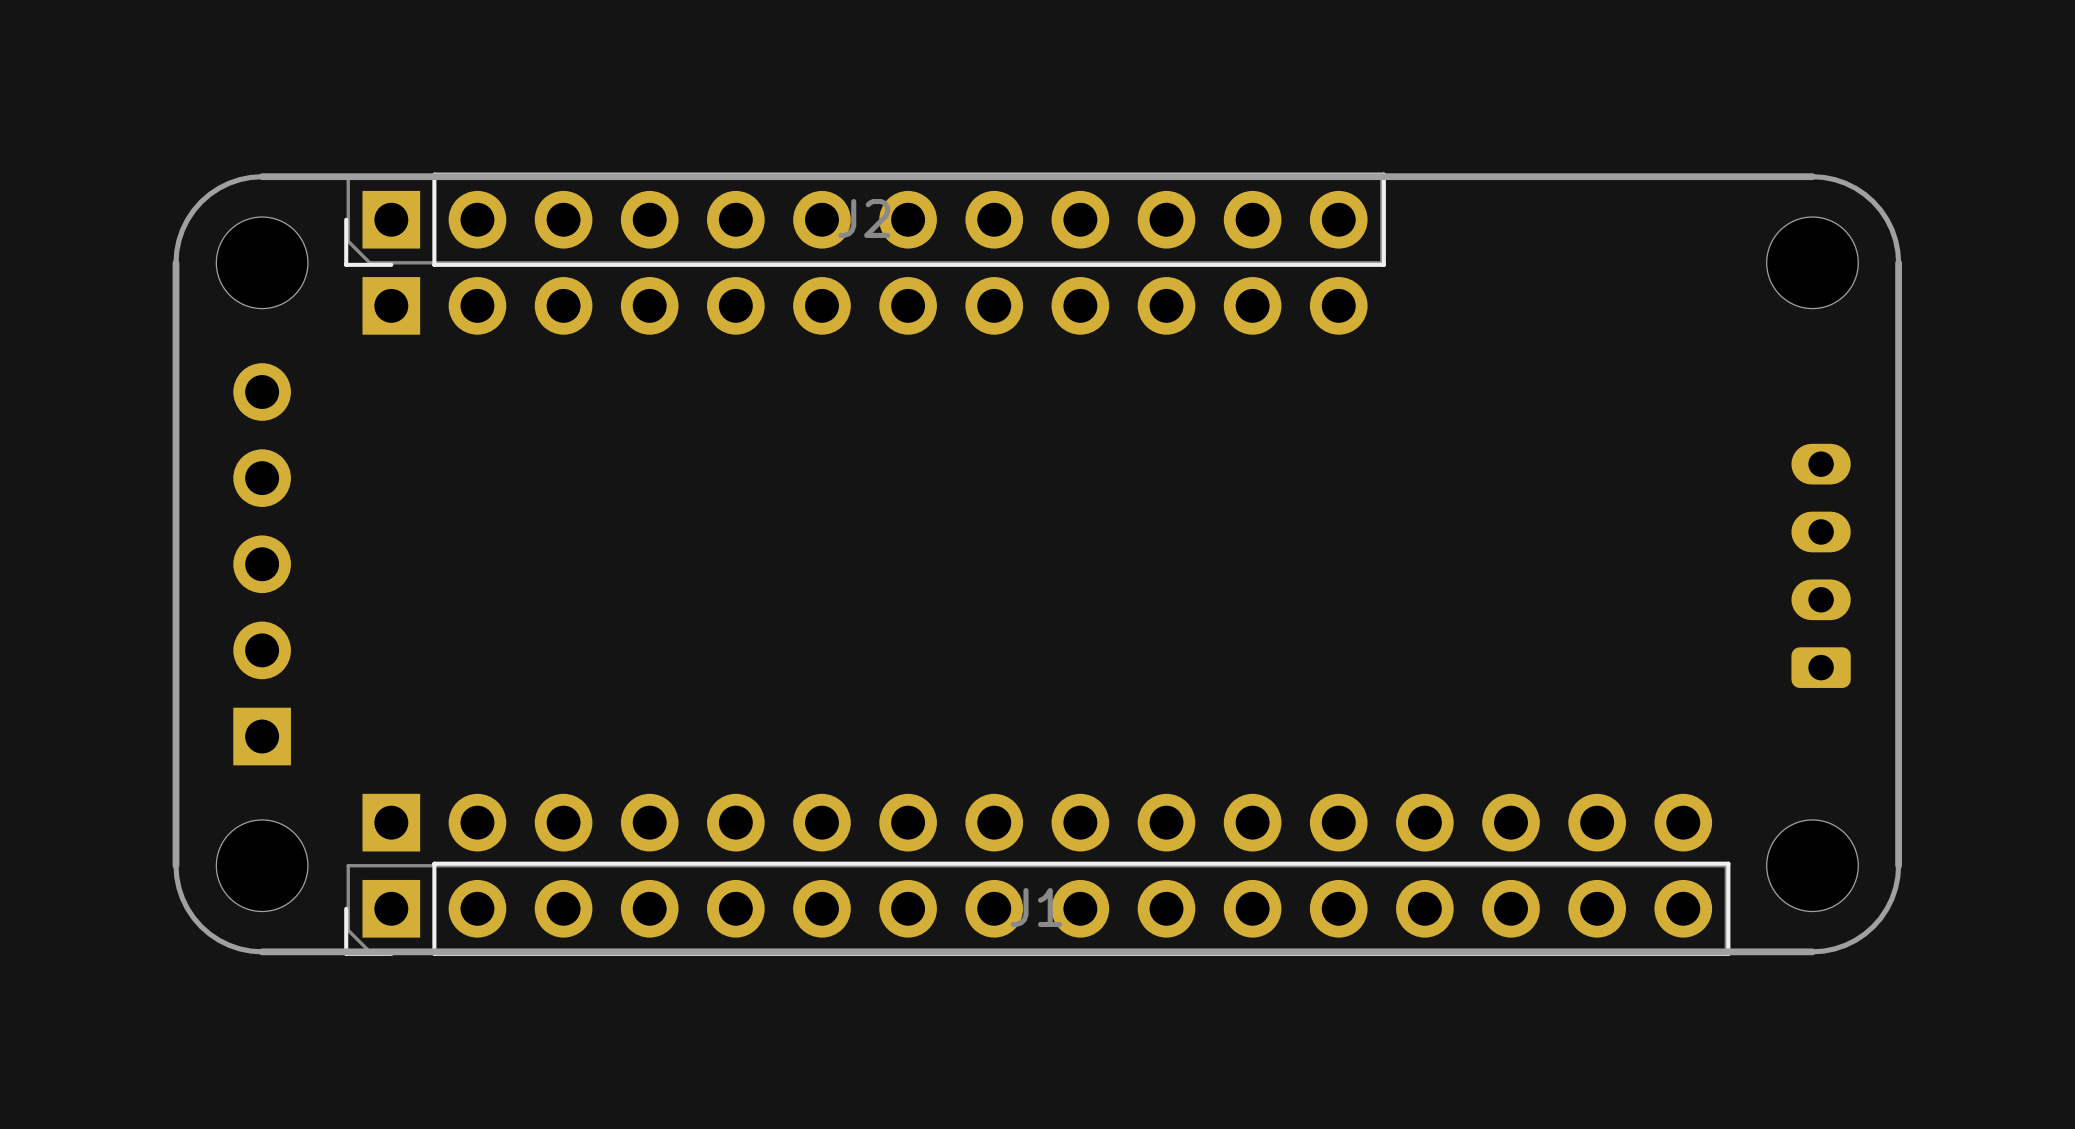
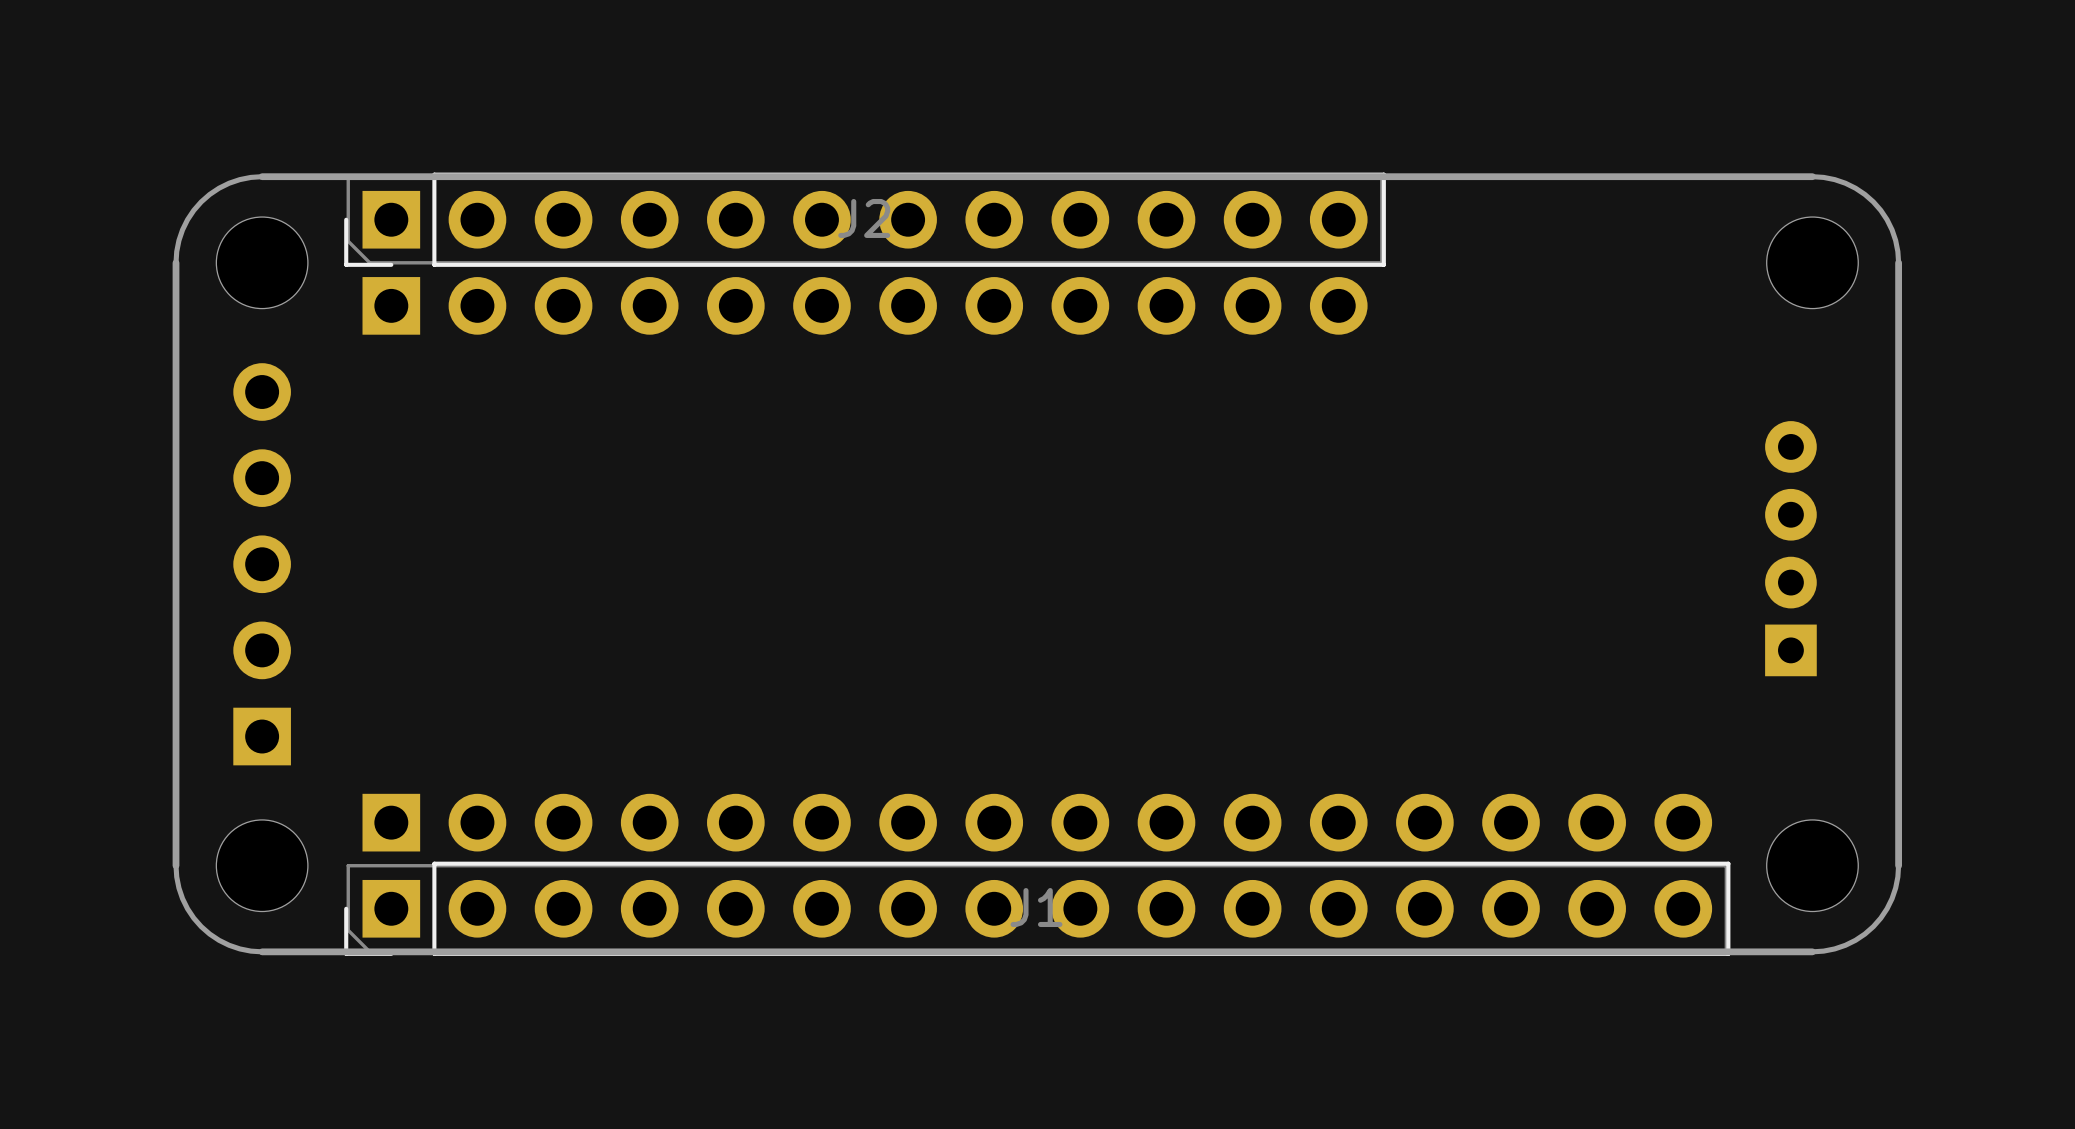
part: none -> (1790, 548)
part: (1821, 565) -> none

